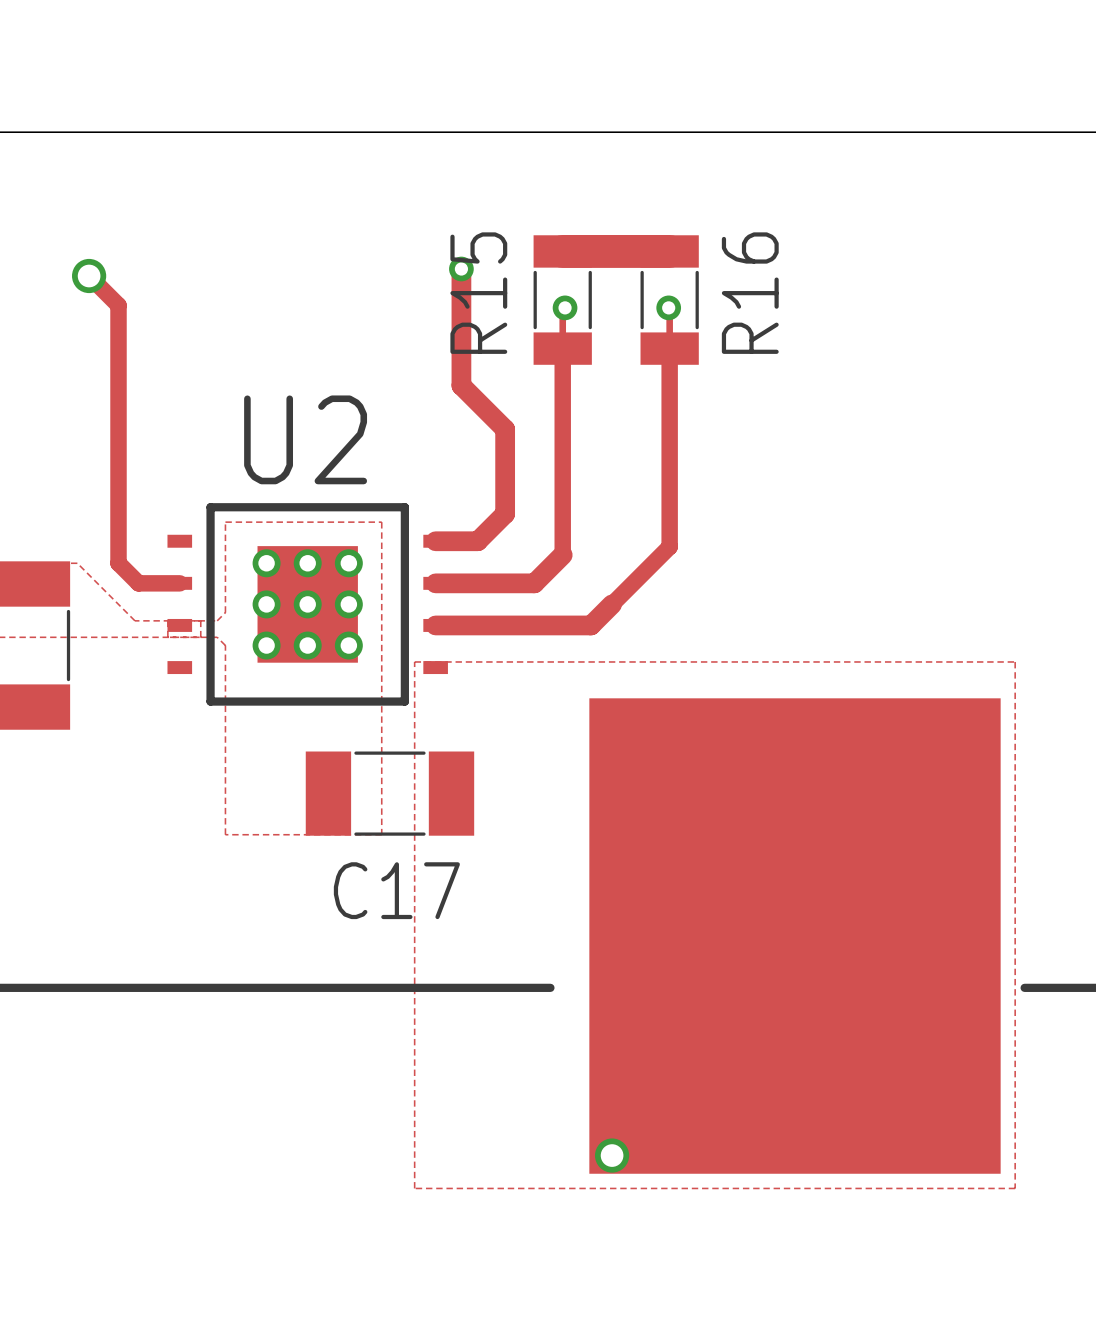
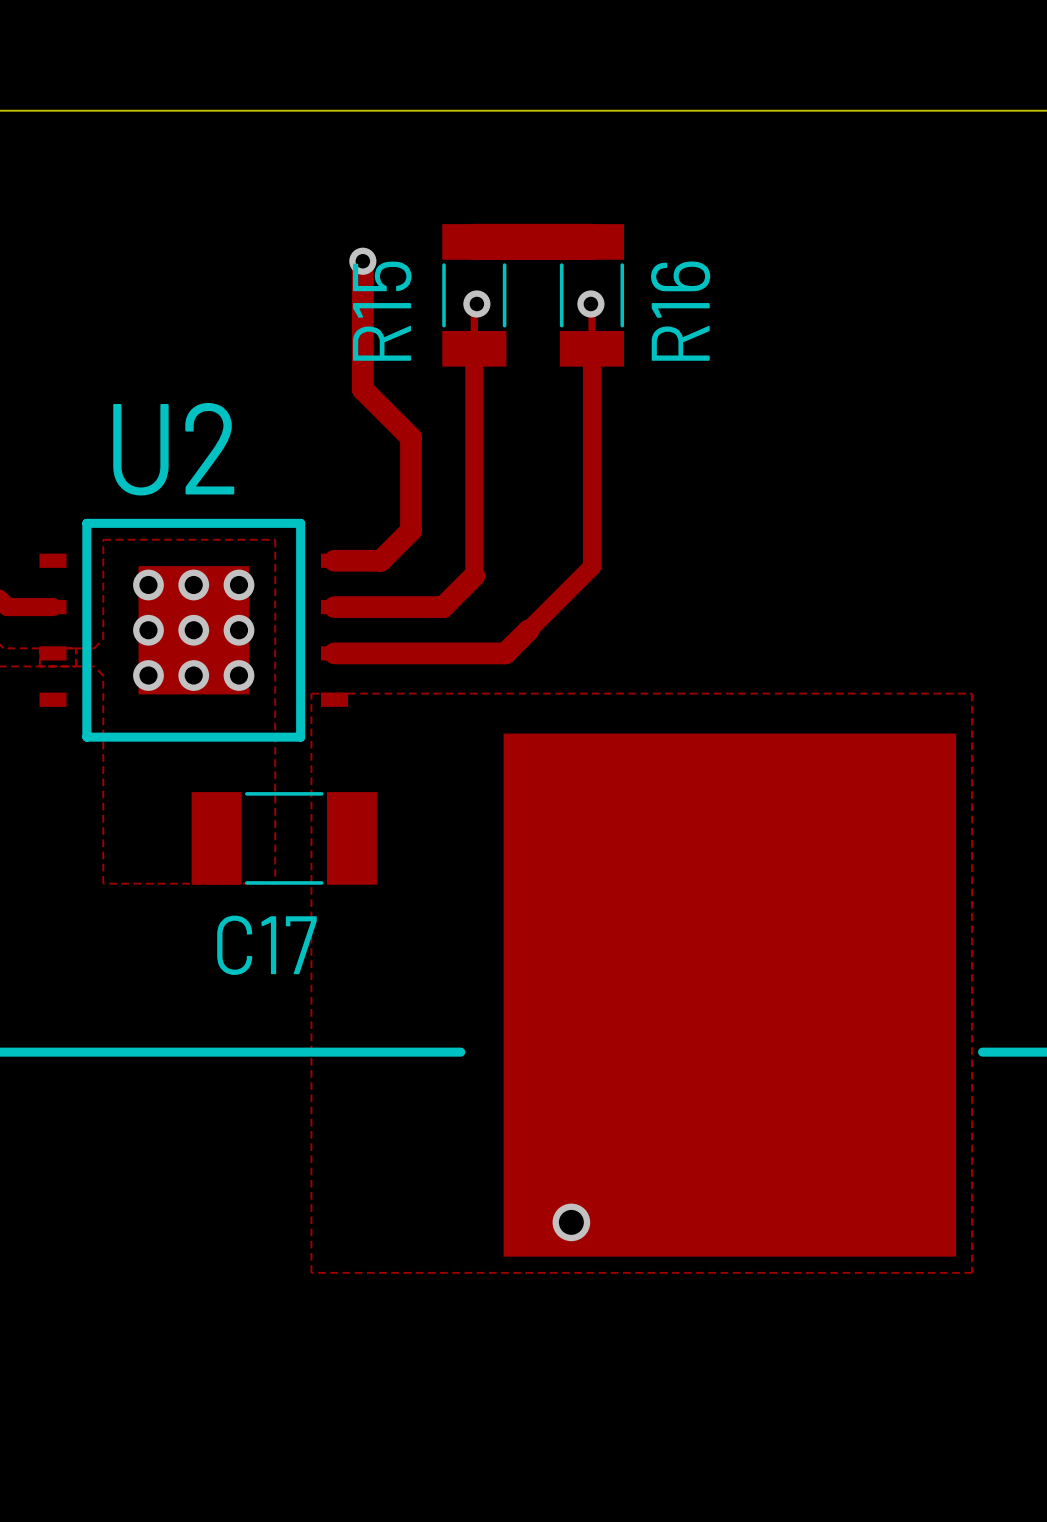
via position: (612, 1155) -> (571, 1222)

